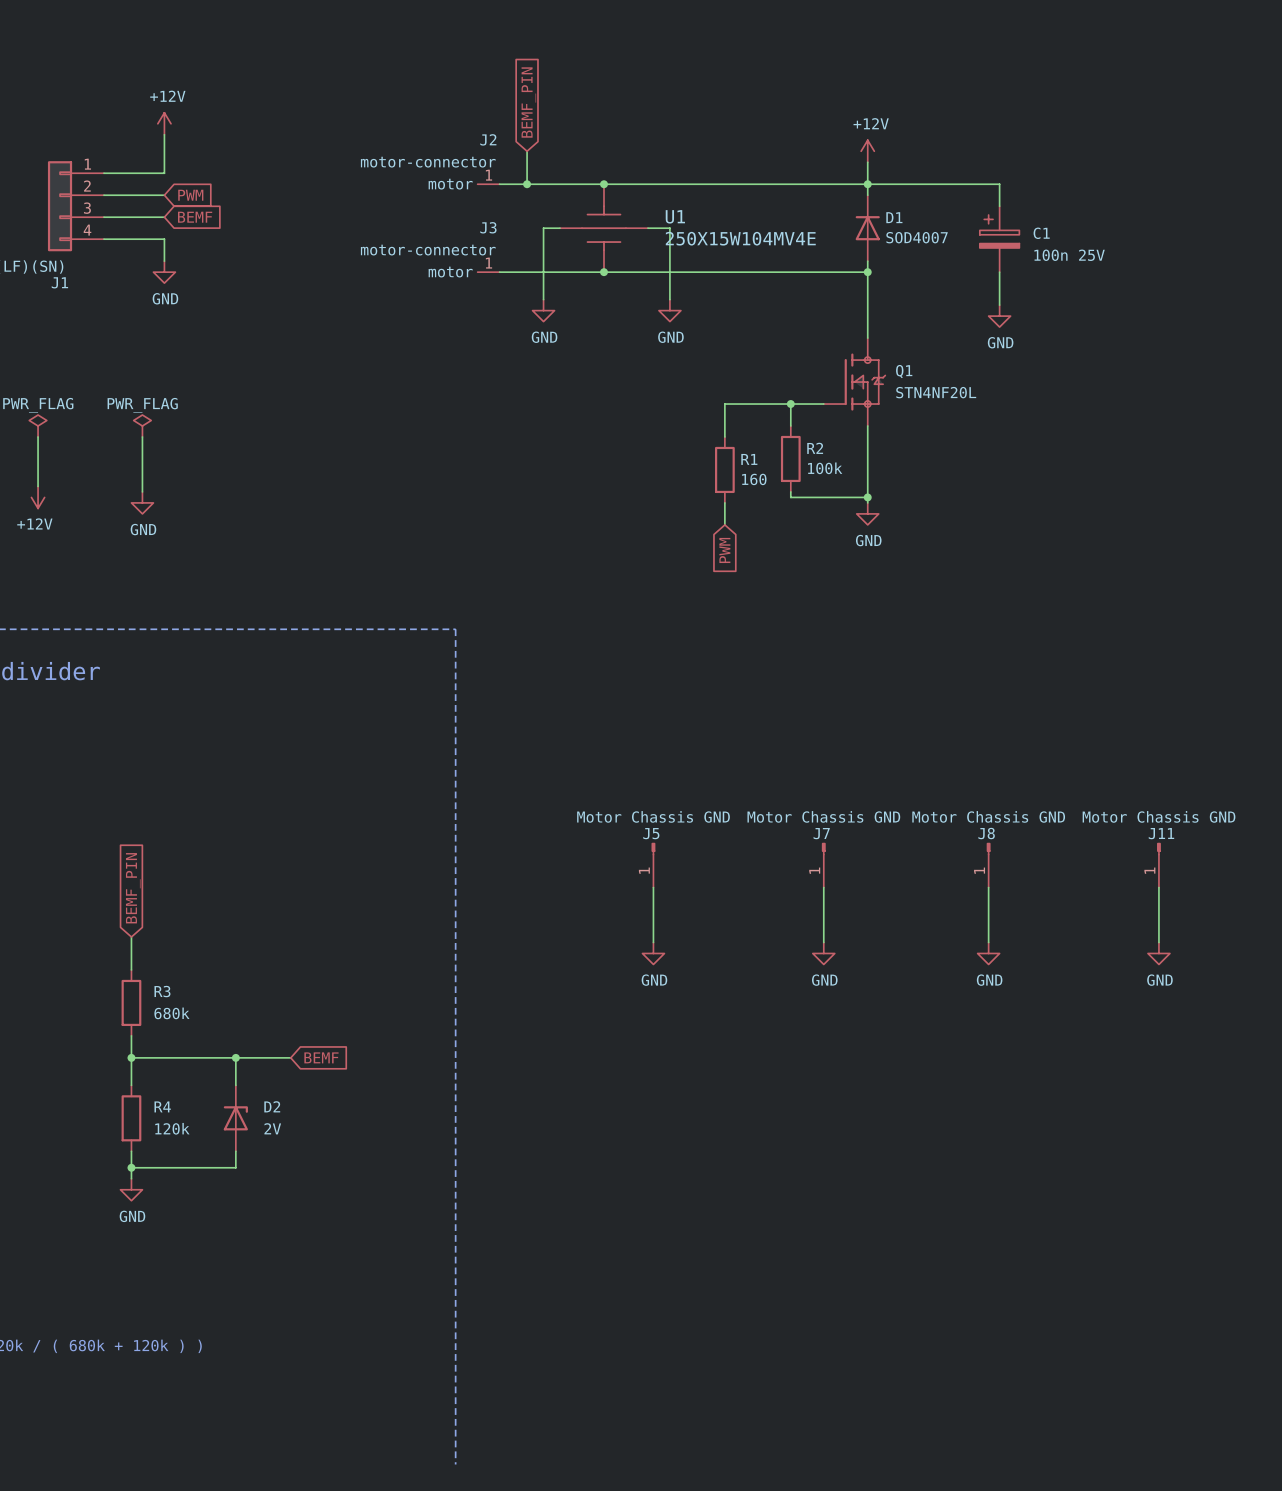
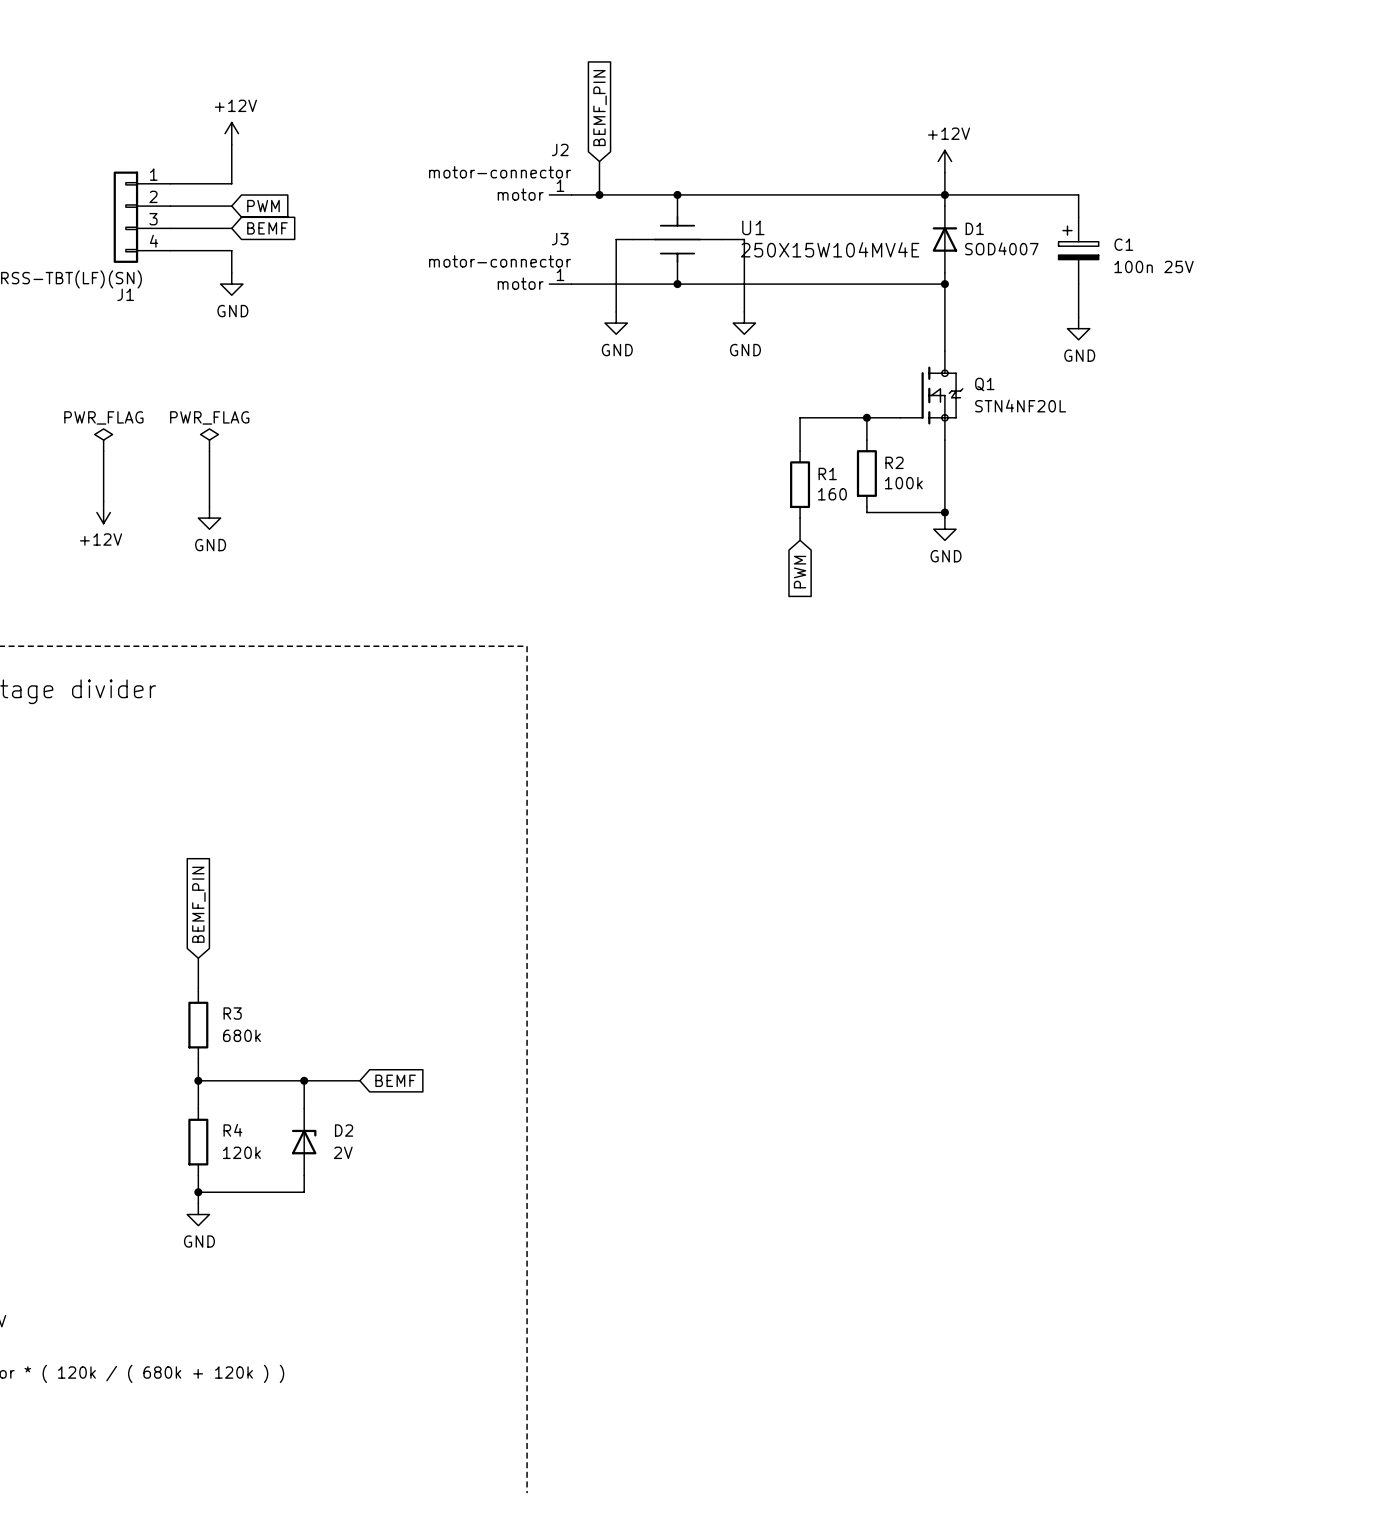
J5: Motor Chassis GND (653, 865) -> none
J7: Motor Chassis GND (823, 865) -> none
J8: Motor Chassis GND (988, 865) -> none
J11: Motor Chassis GND (1158, 865) -> none
wire: (653, 887) (653, 942) -> none
wire: (823, 887) (823, 942) -> none
wire: (988, 887) (988, 942) -> none
wire: (1158, 887) (1158, 942) -> none
power symbol: GND (653, 953) -> none
power symbol: GND (823, 953) -> none
power symbol: GND (988, 953) -> none
power symbol: GND (1158, 953) -> none

